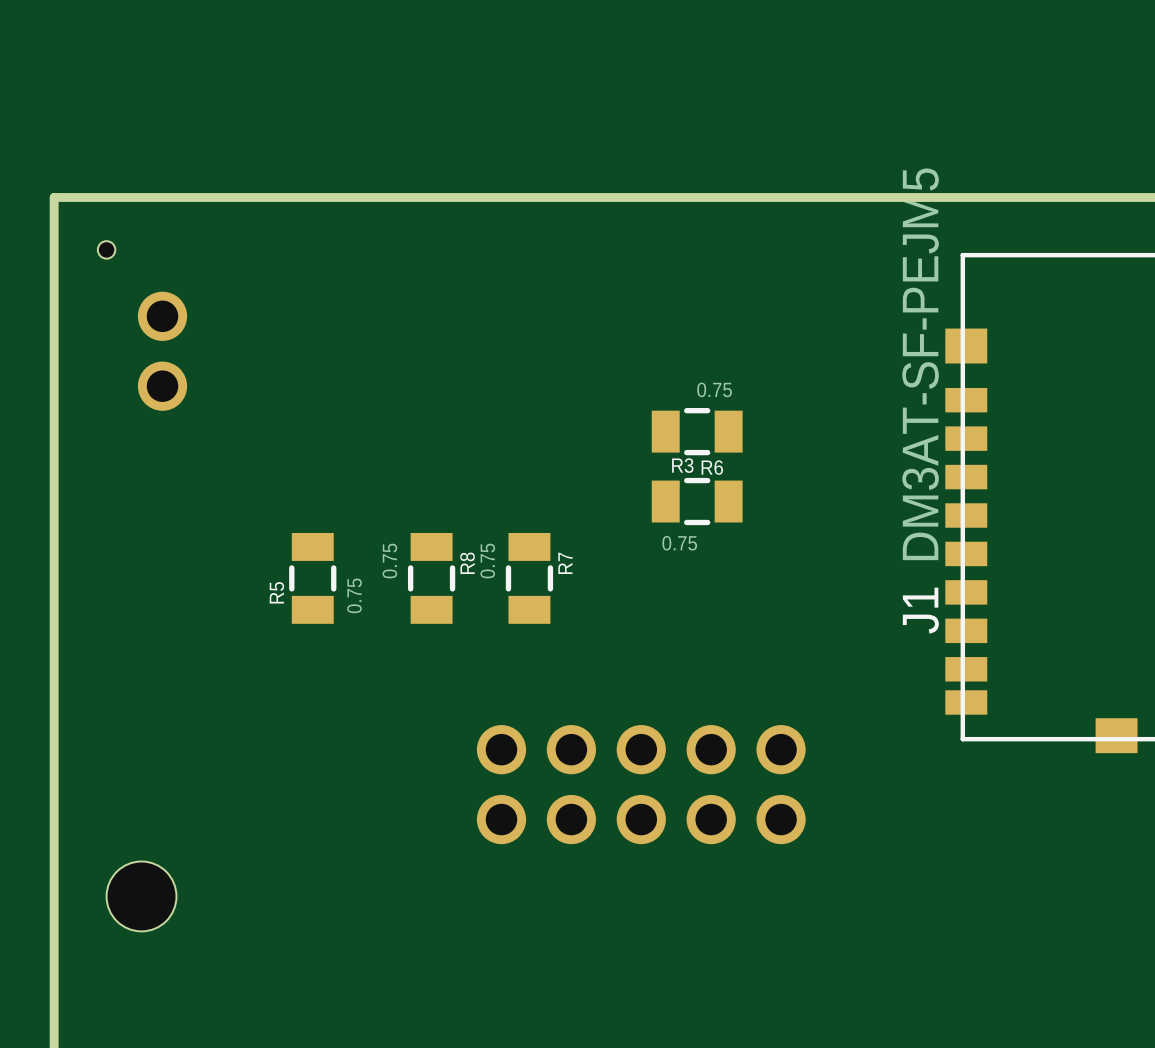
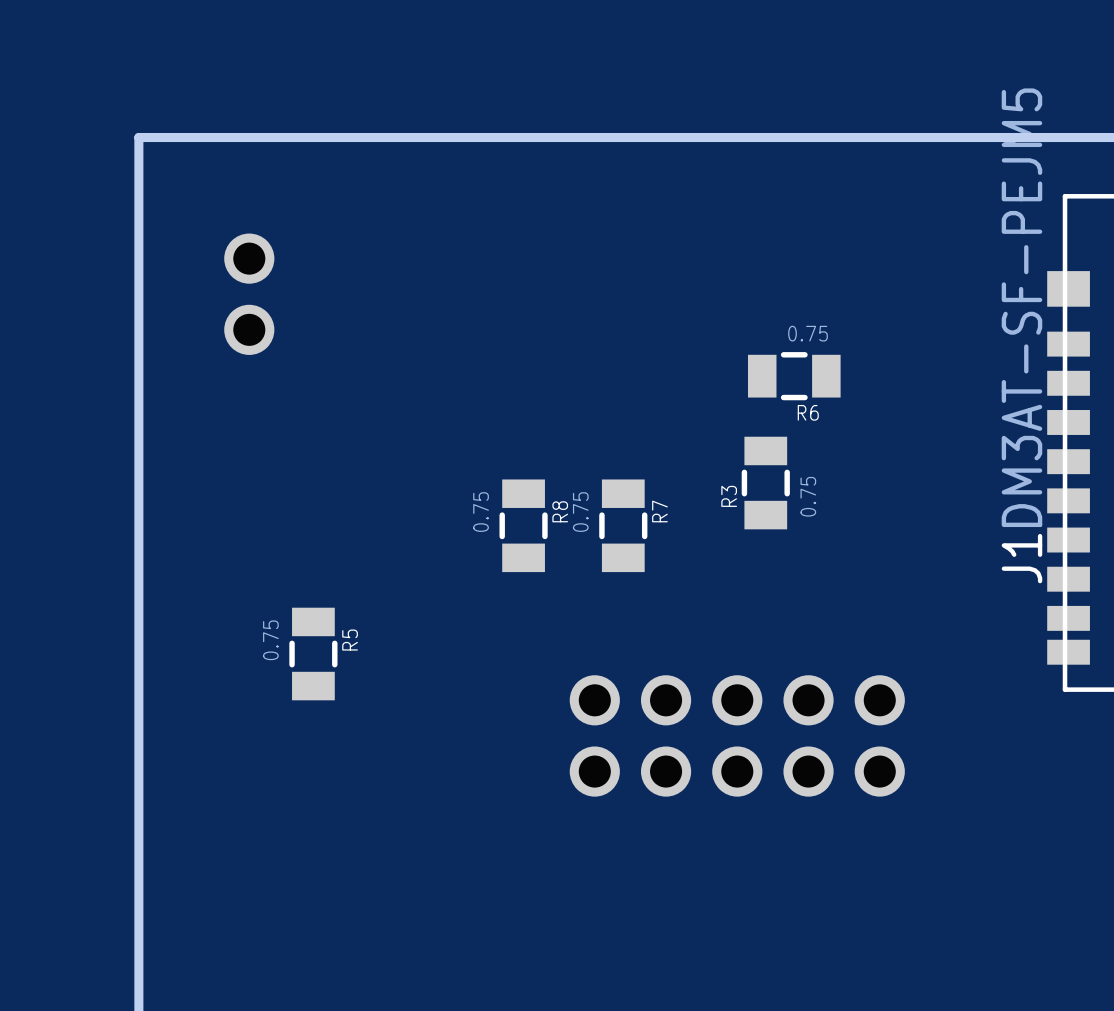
hole: (106, 249) -> none
R3 rotation: 0° (697, 501) -> 90° clockwise (765, 483)
R5 position: (312, 578) -> (313, 654)
R5 name position: R5 (276, 592) -> R5 (350, 640)
R5 value position: 0.75 (354, 595) -> 0.75 (270, 640)
hole: (141, 896) -> none

